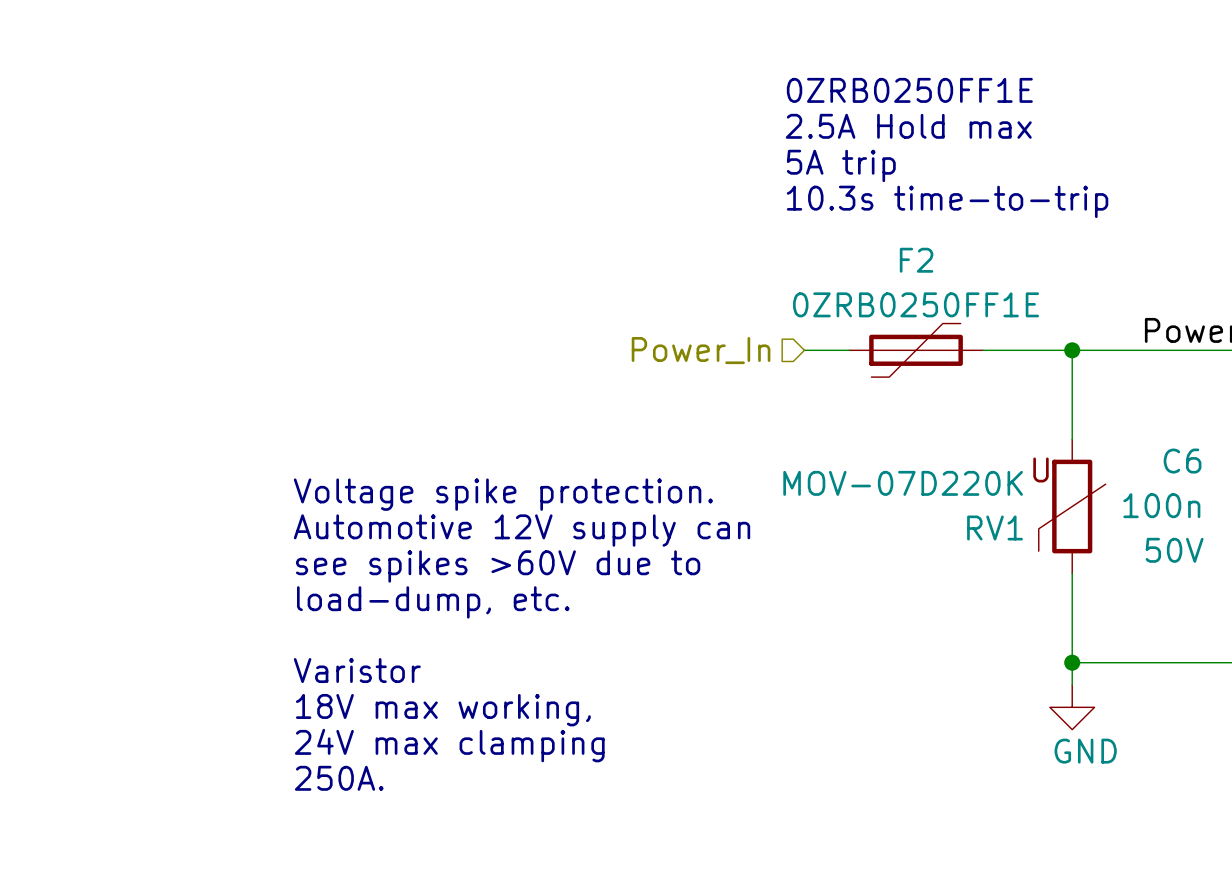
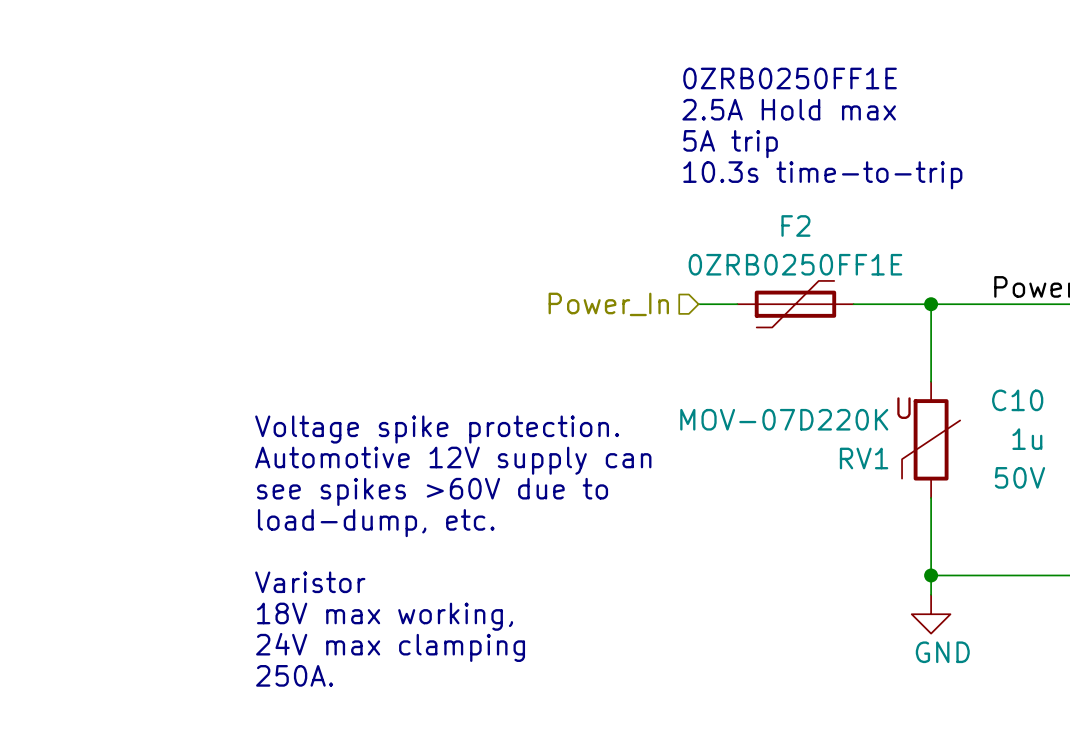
C6 name: C6 (1182, 461) -> C10 (1017, 400)
C6 value: 100n (1161, 505) -> 1u (1027, 439)

